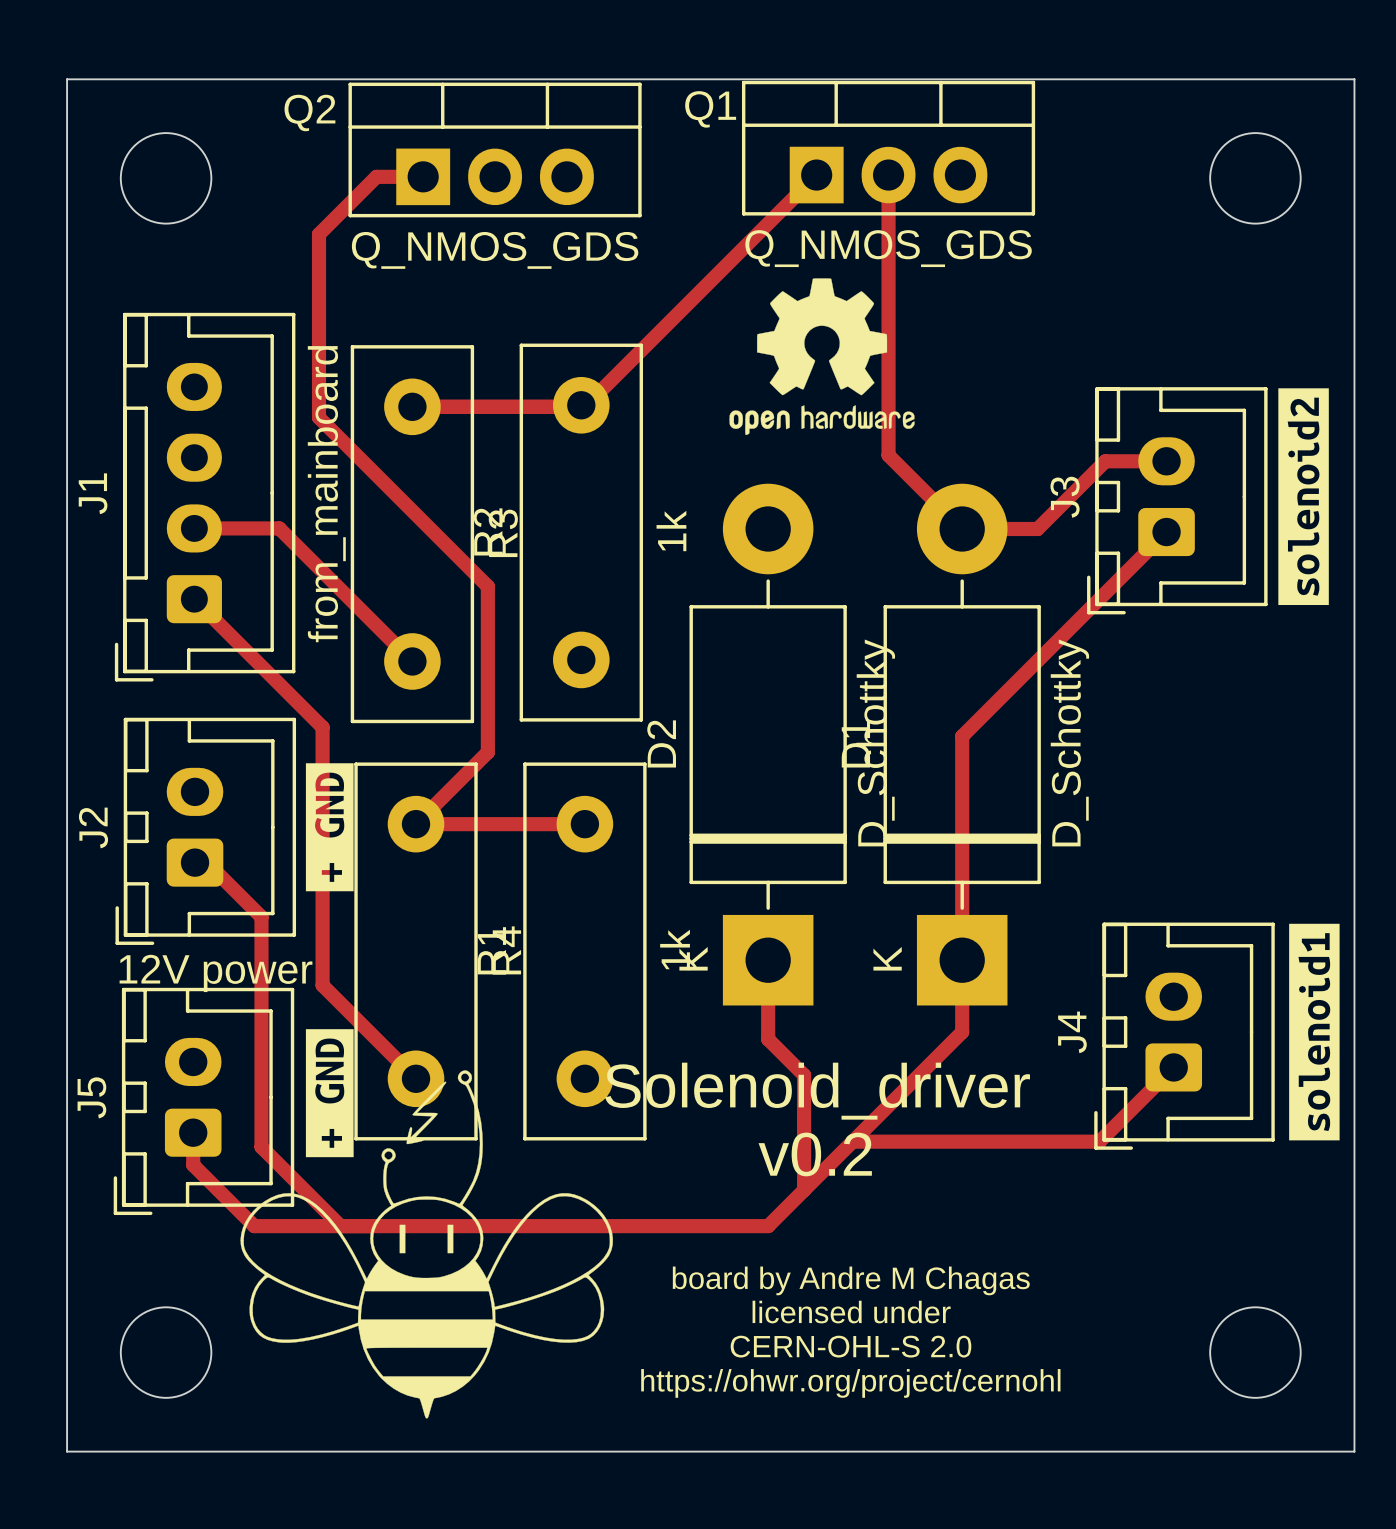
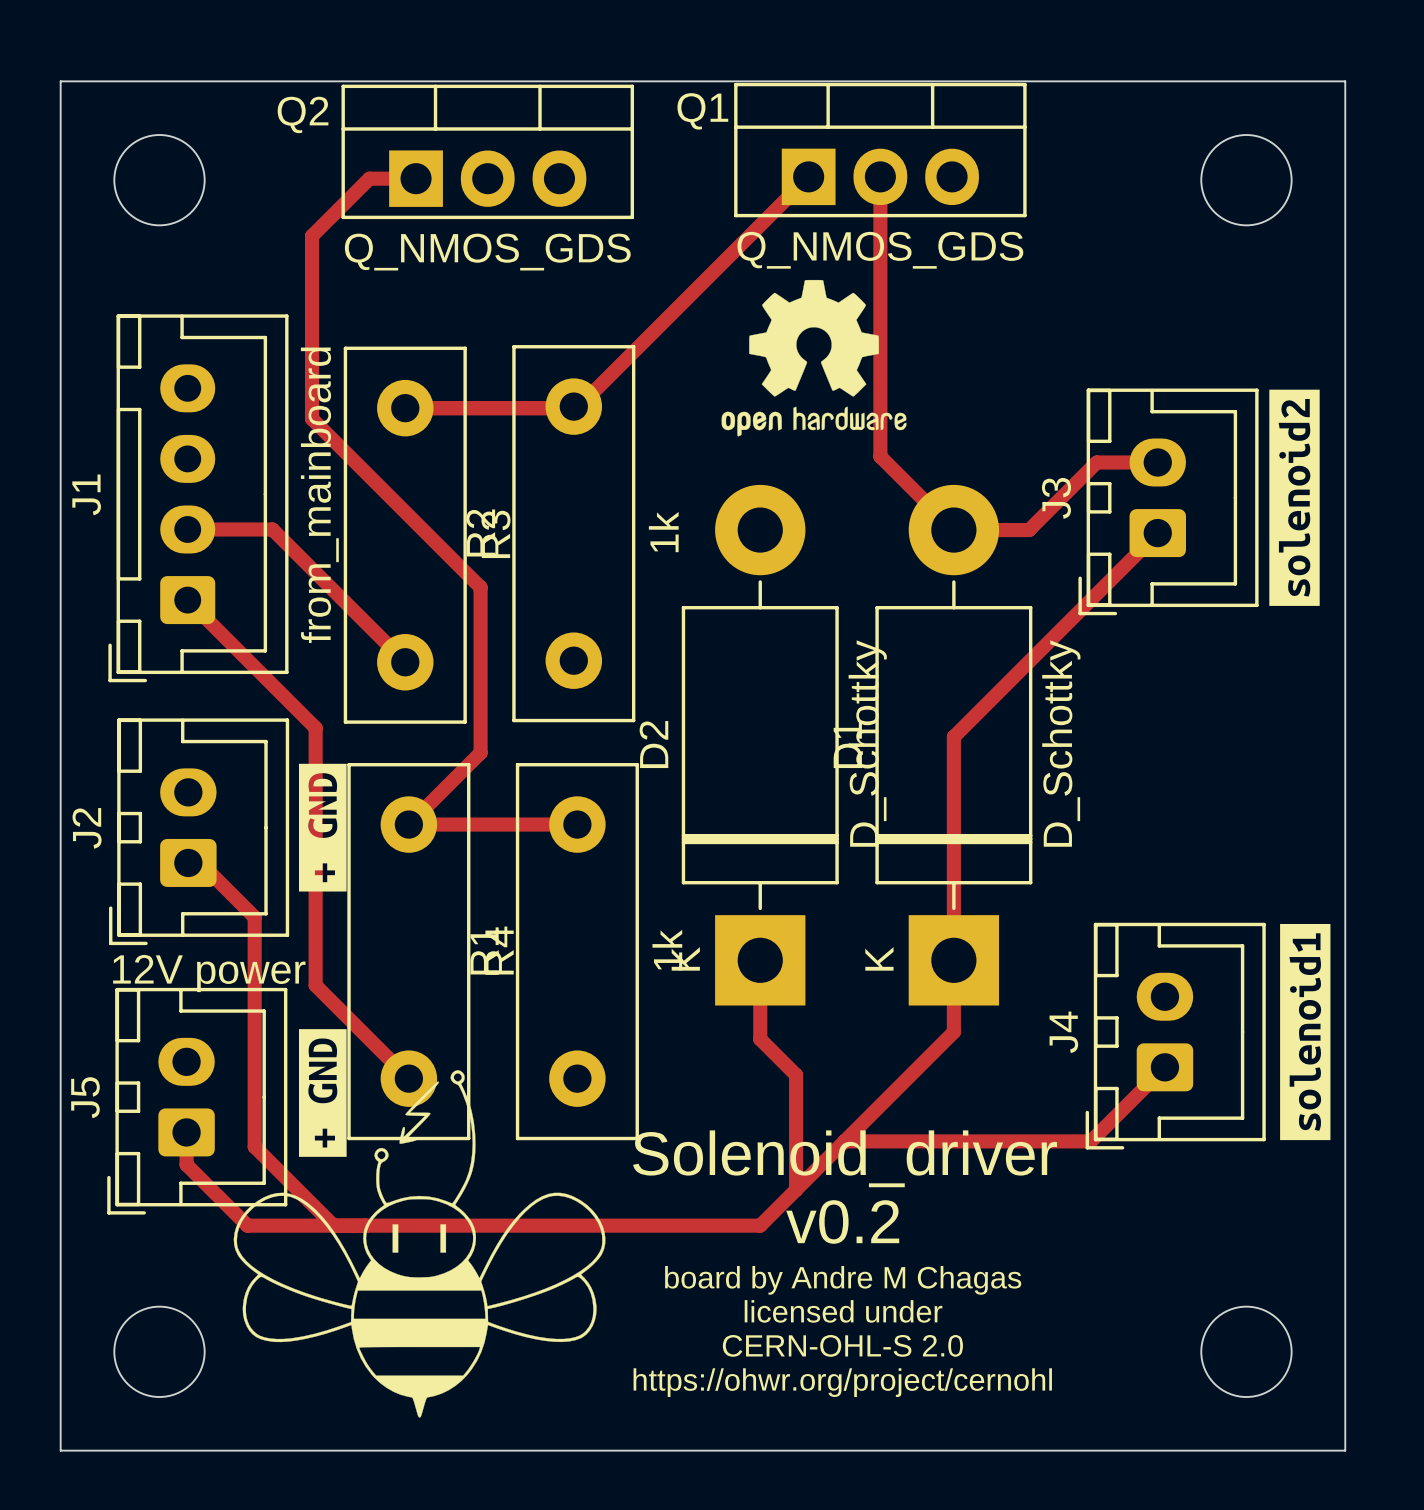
text position: Solenoid_driver (817, 1091) -> Solenoid_driver (845, 1158)
text position: v0.2 (815, 1154) -> v0.2 (842, 1221)

